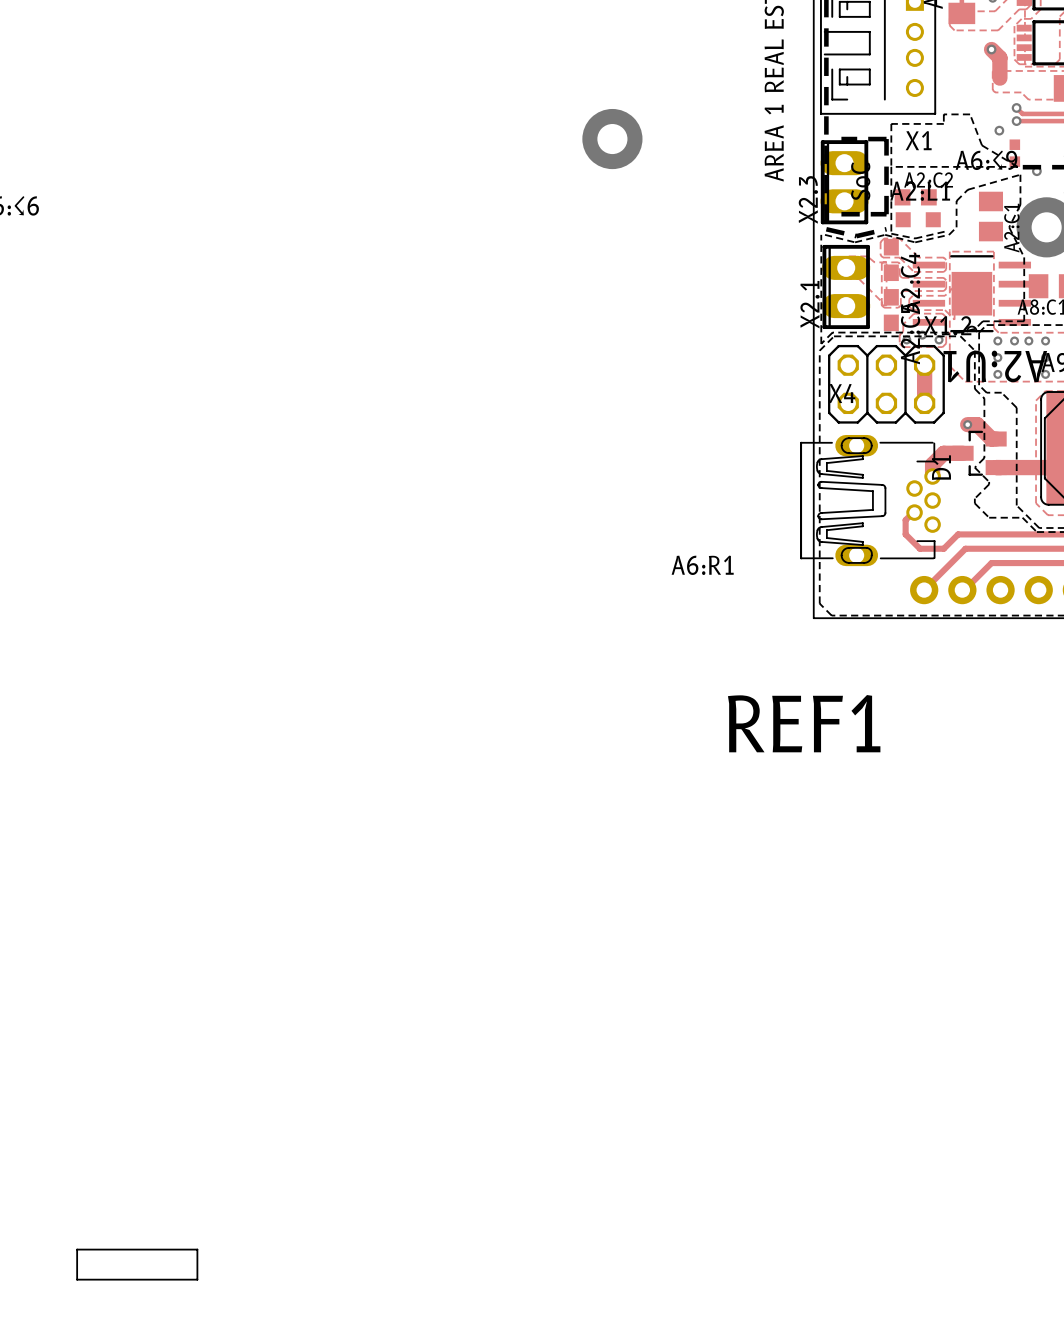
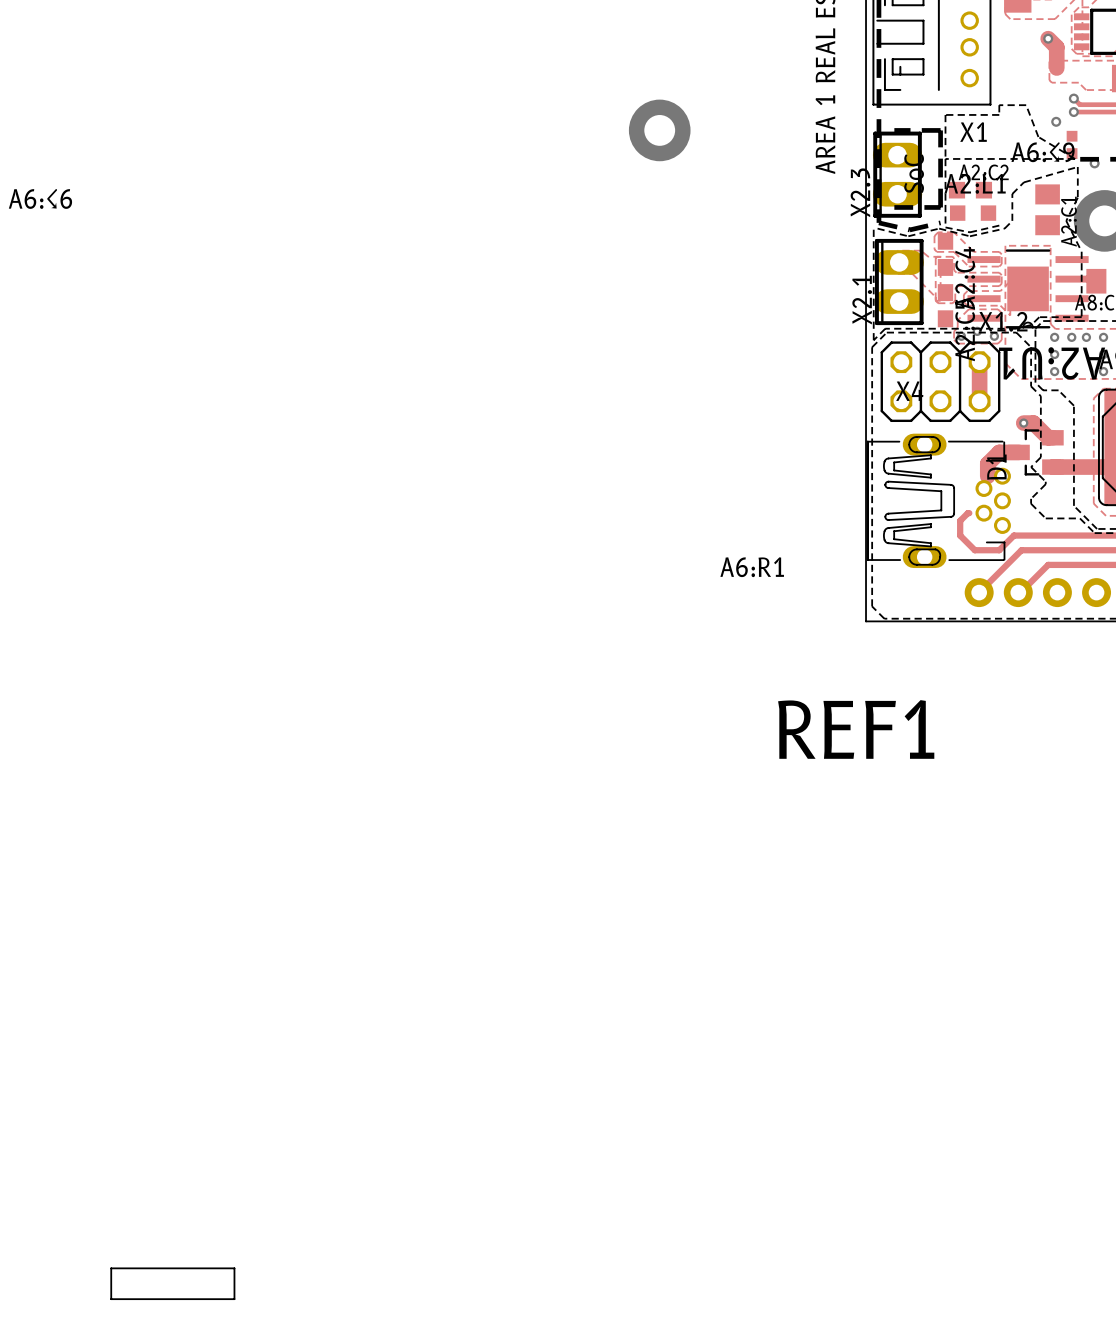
X4 position: (870, 500) -> (938, 500)

